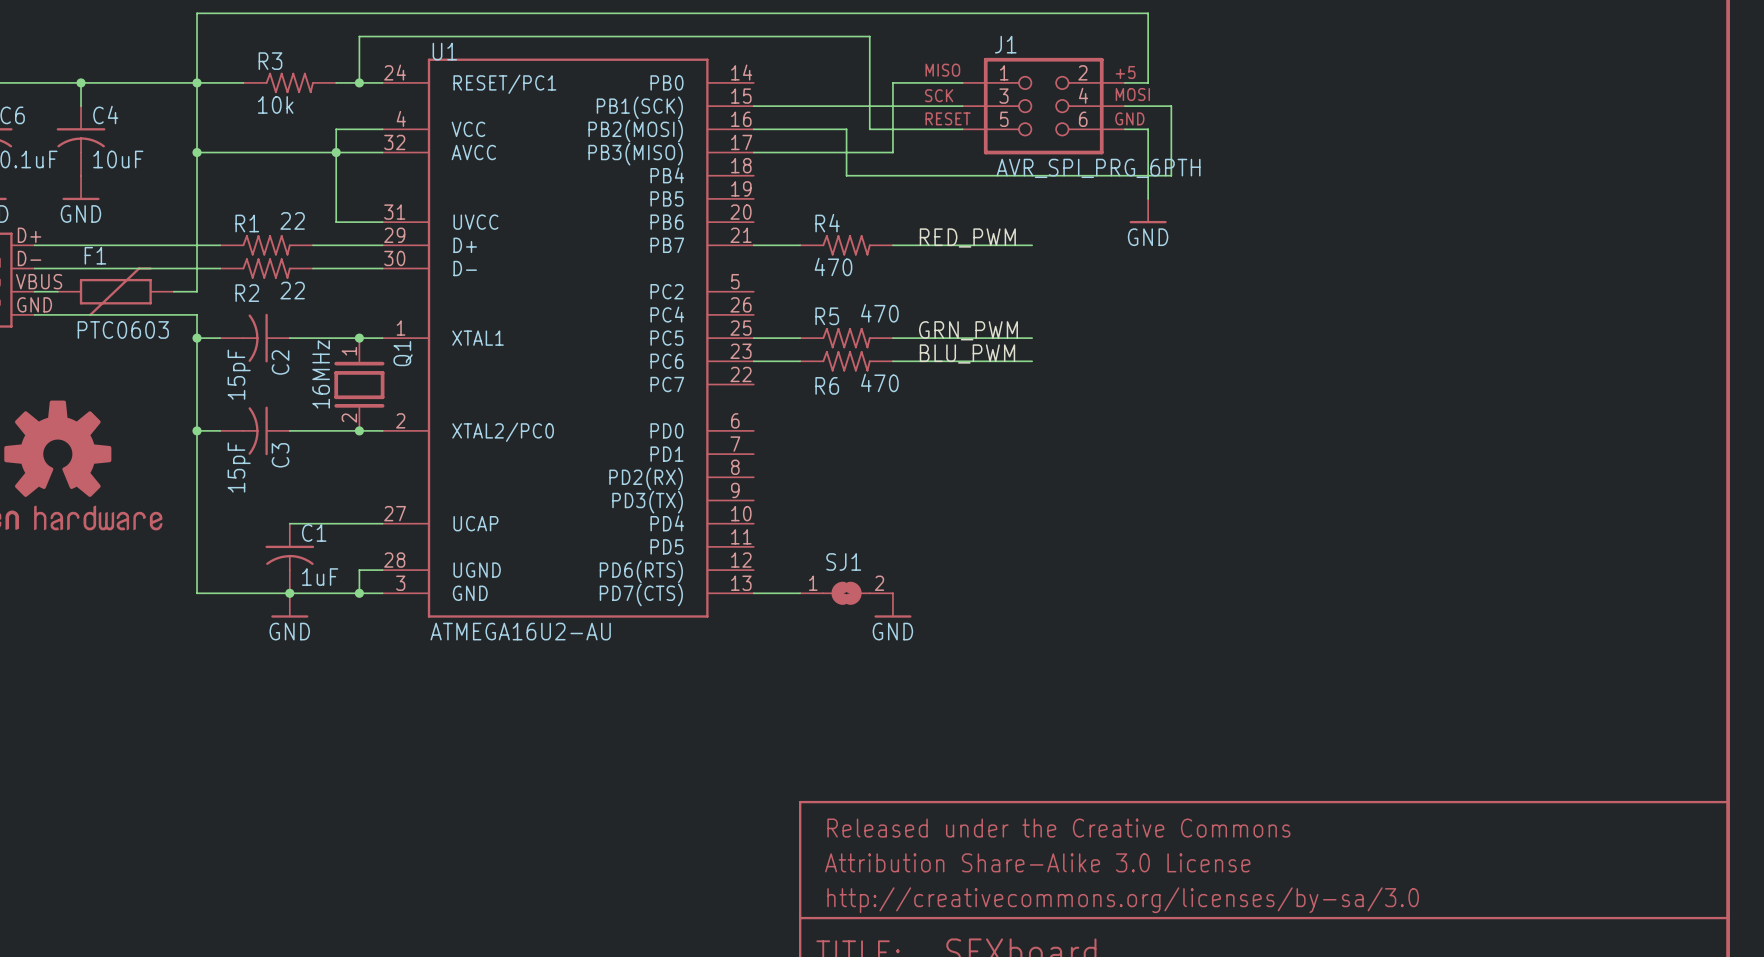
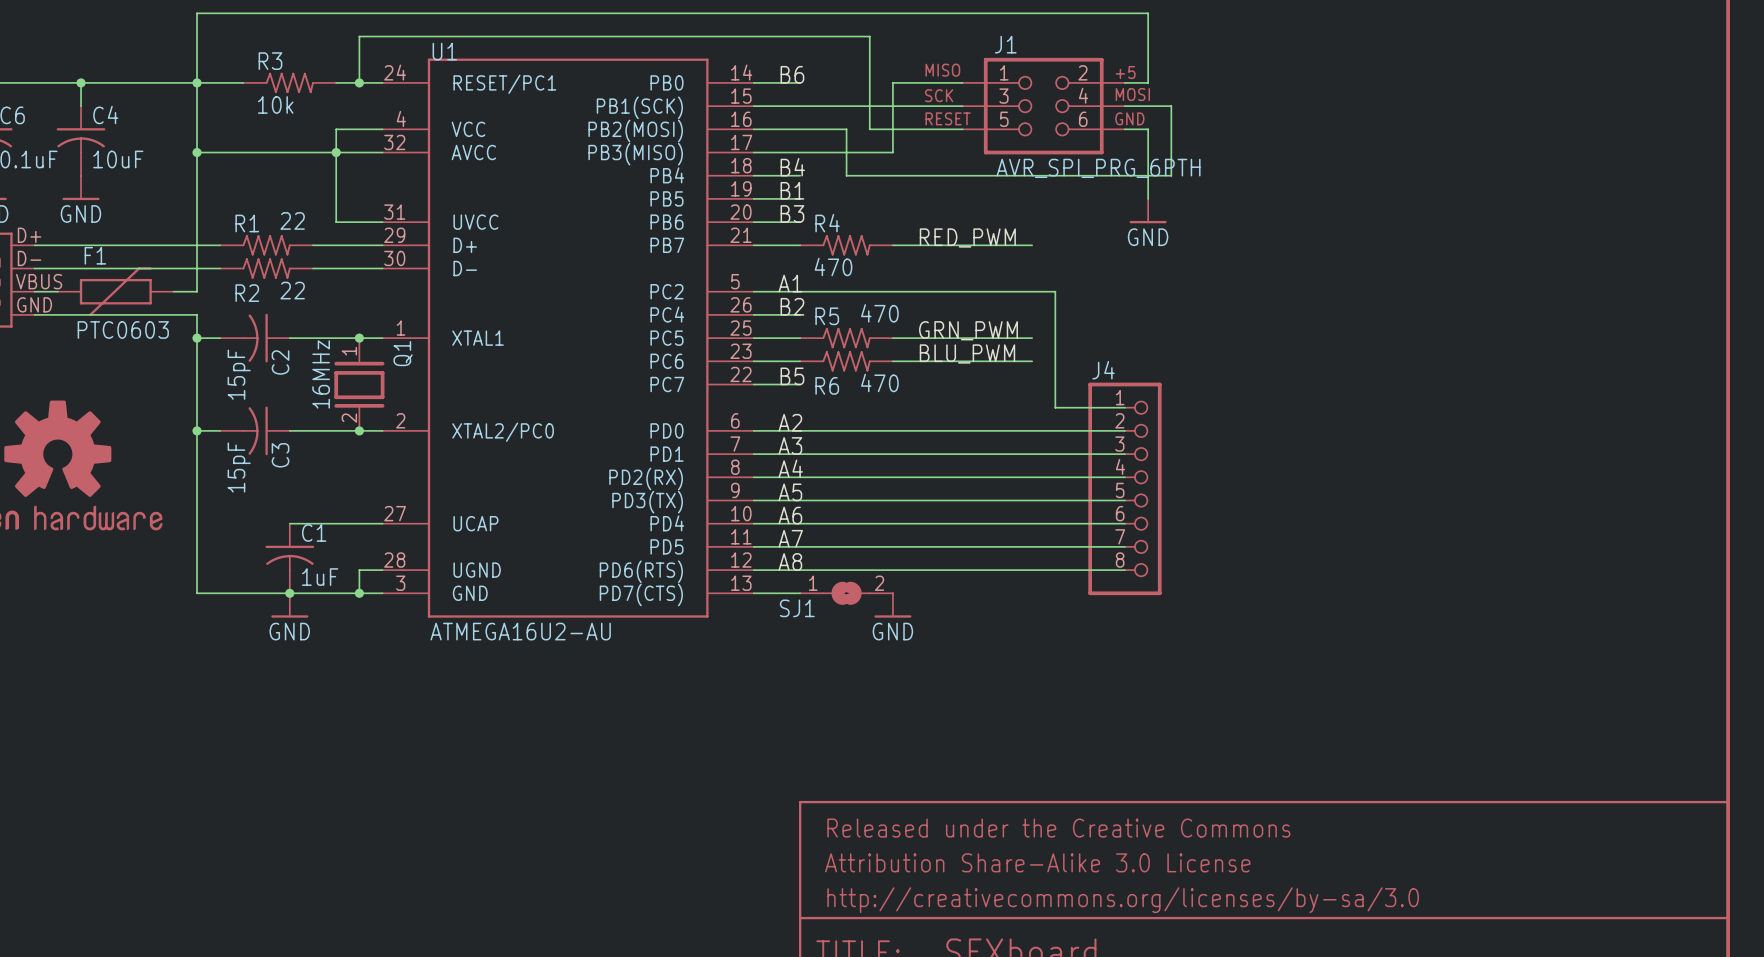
label: none -> B6 (792, 74)
wire: none -> (753, 82) (800, 82)
label: none -> B4 (792, 167)
wire: none -> (753, 175) (800, 175)
label: none -> B1 (792, 190)
wire: none -> (753, 198) (800, 198)
label: none -> B3 (792, 214)
wire: none -> (753, 222) (800, 222)
label: none -> A1 (790, 283)
wire: none -> (753, 291) (1055, 291) (1055, 407) (1124, 407)
label: none -> B2 (792, 306)
wire: none -> (753, 314) (800, 314)
label: none -> B5 (792, 376)
wire: none -> (753, 384) (800, 384)
label: none -> A2 (790, 422)
wire: none -> (753, 430) (1124, 430)
label: none -> A3 (790, 445)
wire: none -> (753, 454) (1124, 454)
label: none -> A4 (790, 468)
wire: none -> (753, 477) (1124, 477)
J4: none -> (1124, 488)
label: none -> A5 (790, 492)
wire: none -> (753, 500) (1124, 500)
label: none -> A6 (790, 515)
wire: none -> (753, 523) (1124, 523)
label: none -> A7 (790, 538)
wire: none -> (753, 546) (1124, 546)
label: none -> A8 (790, 561)
SJ1 name position: SJ1 (843, 561) -> SJ1 (797, 608)
wire: none -> (753, 570) (1124, 570)

